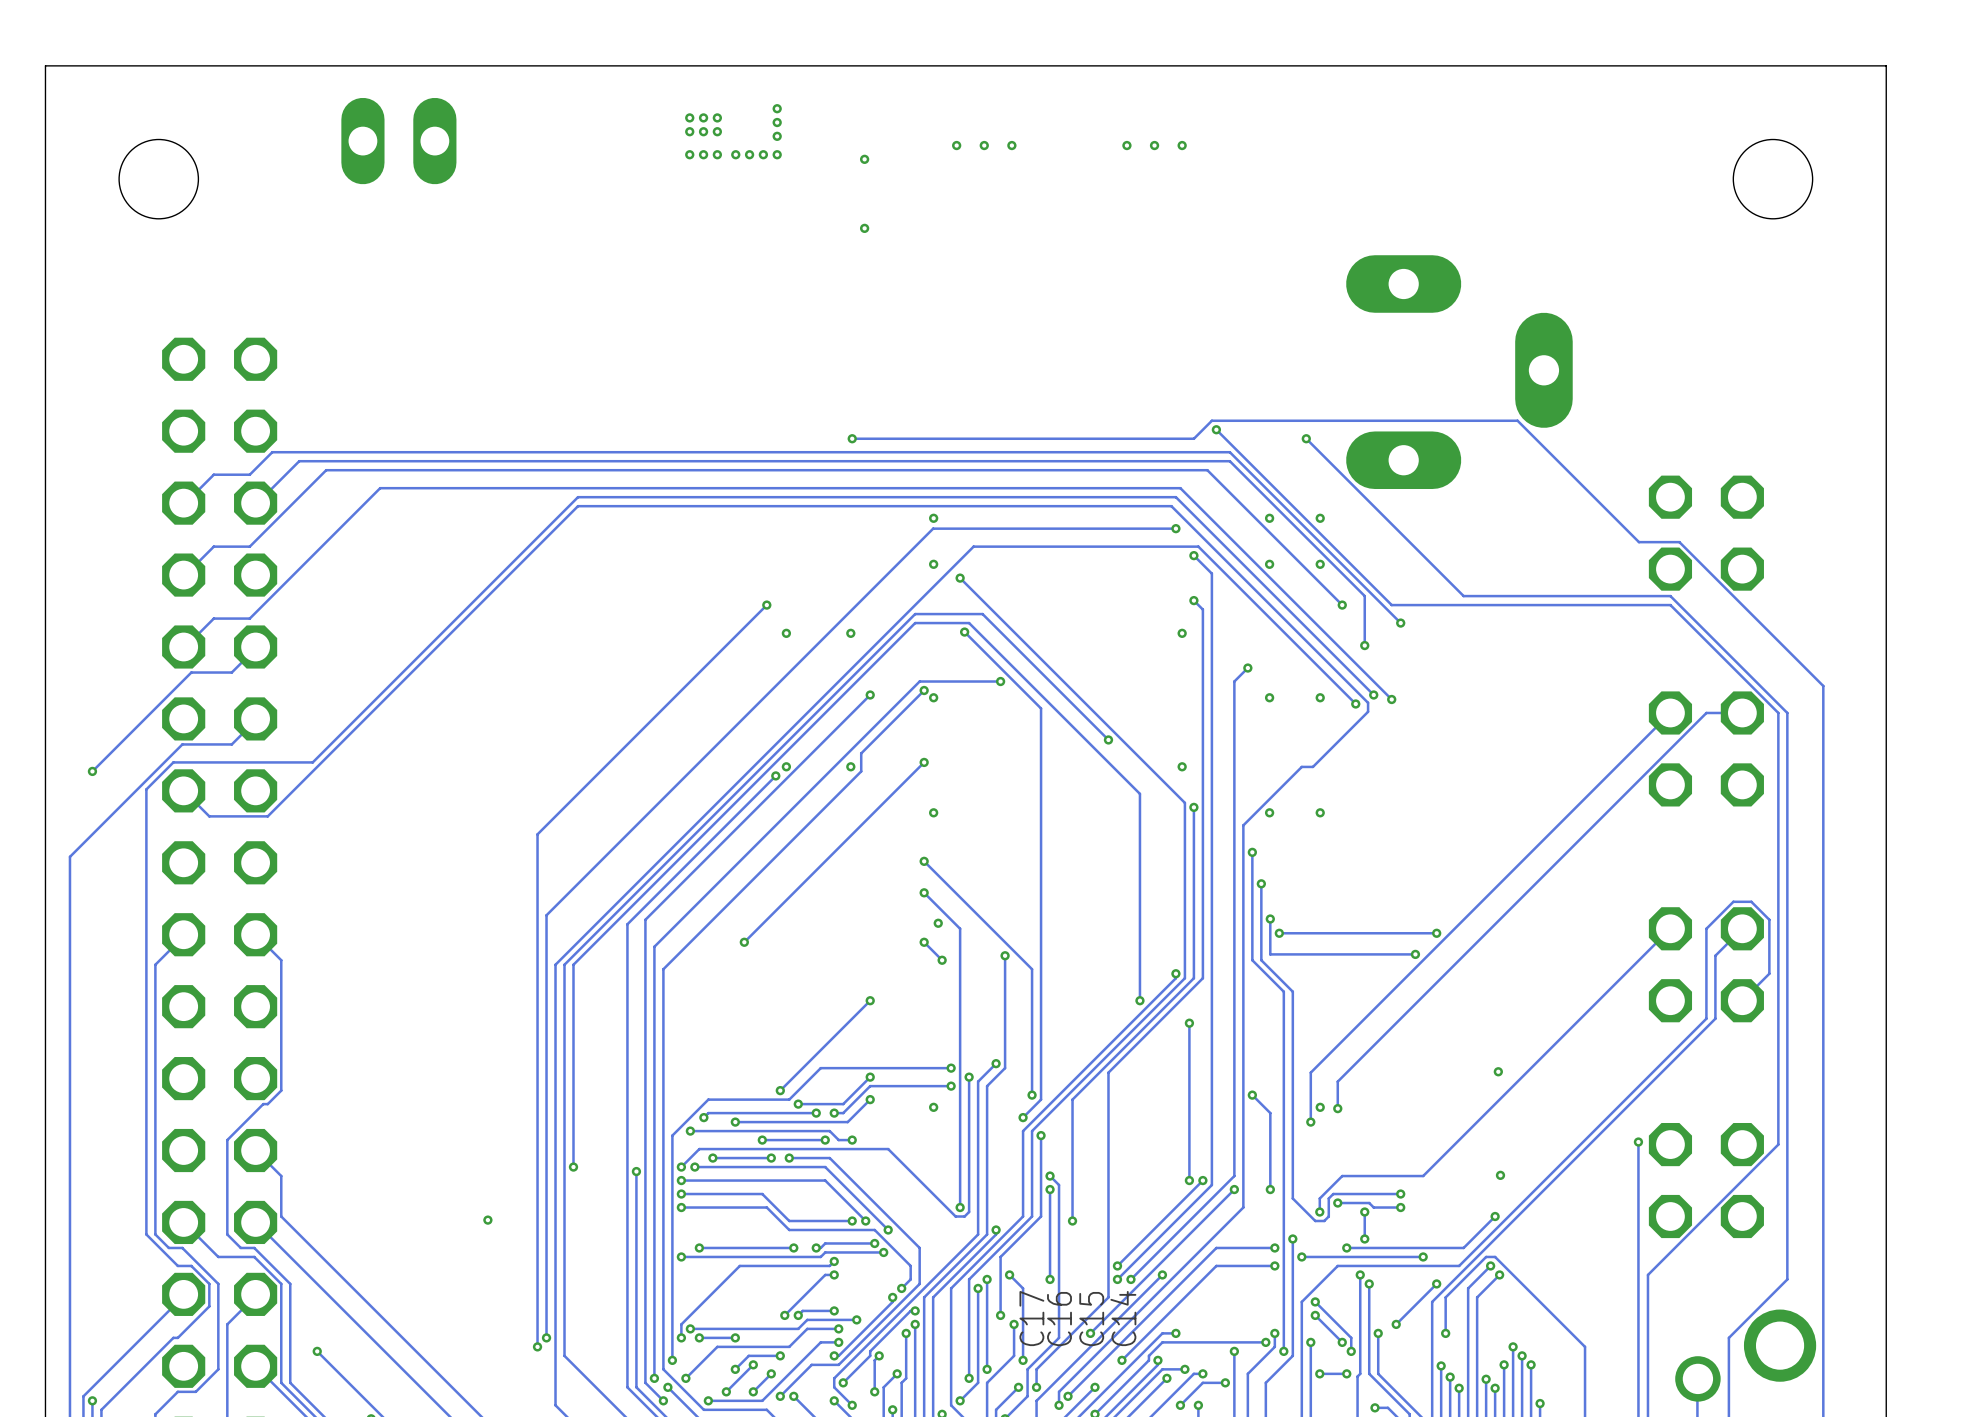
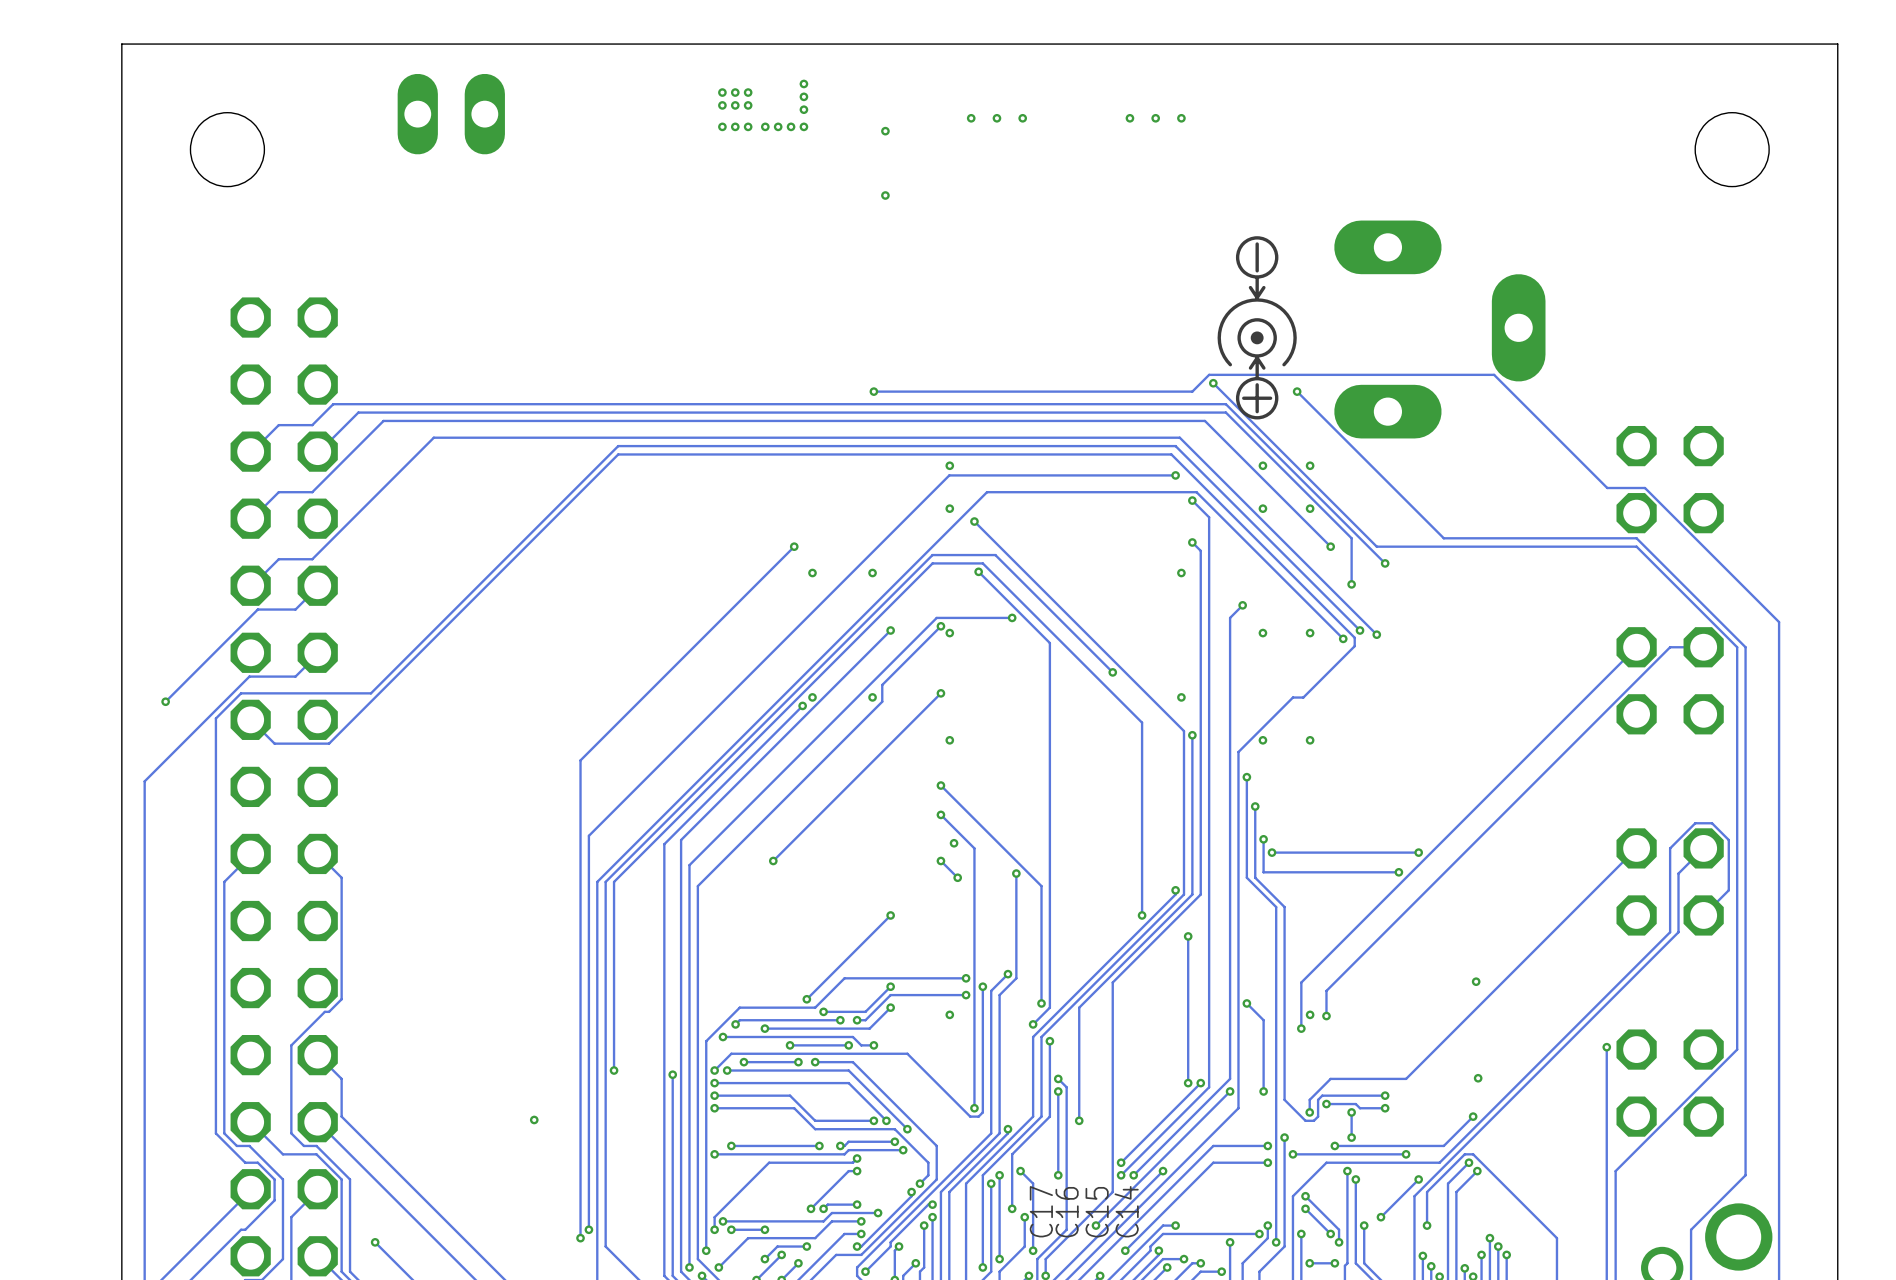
part: none -> (1381, 329)

